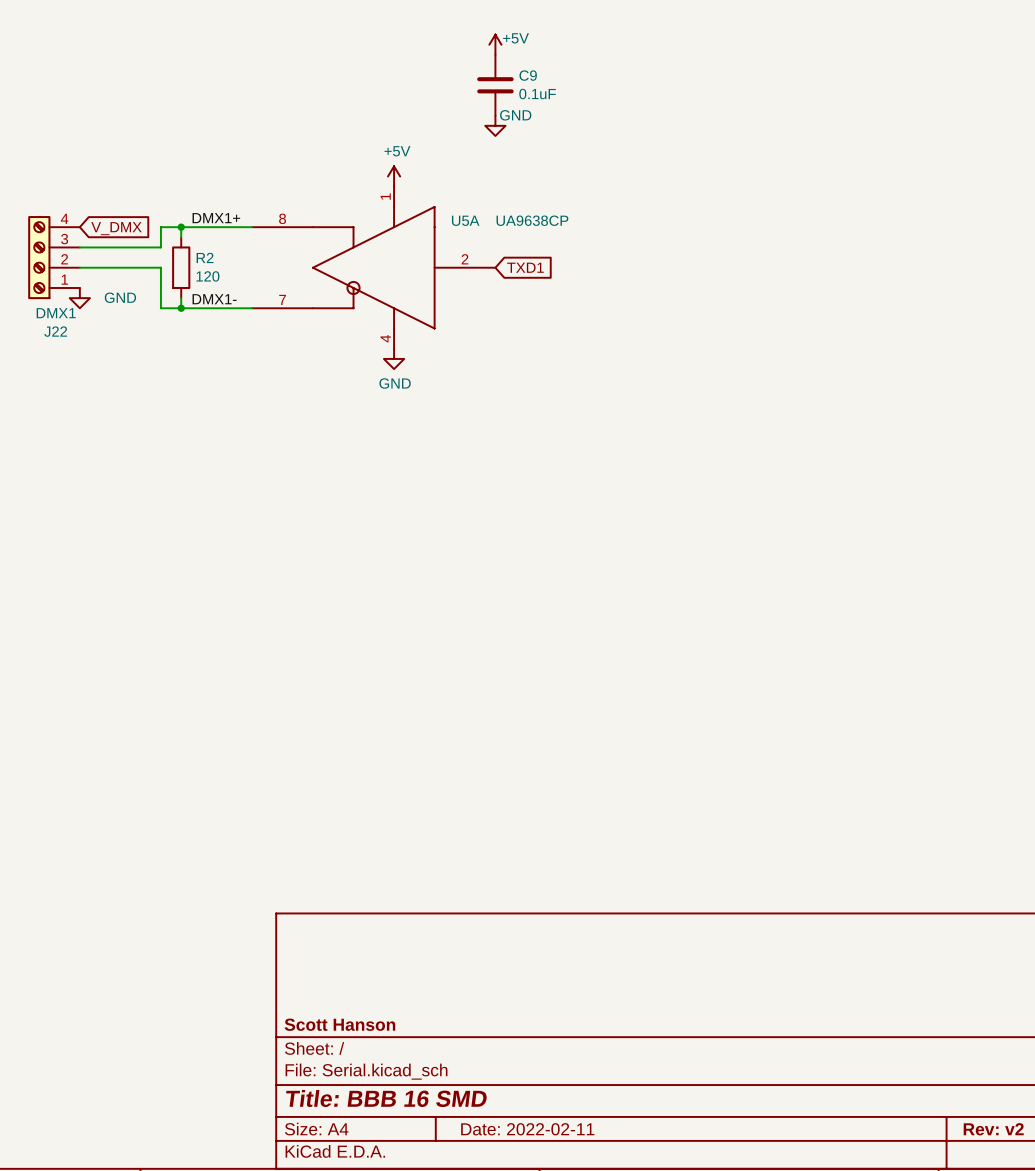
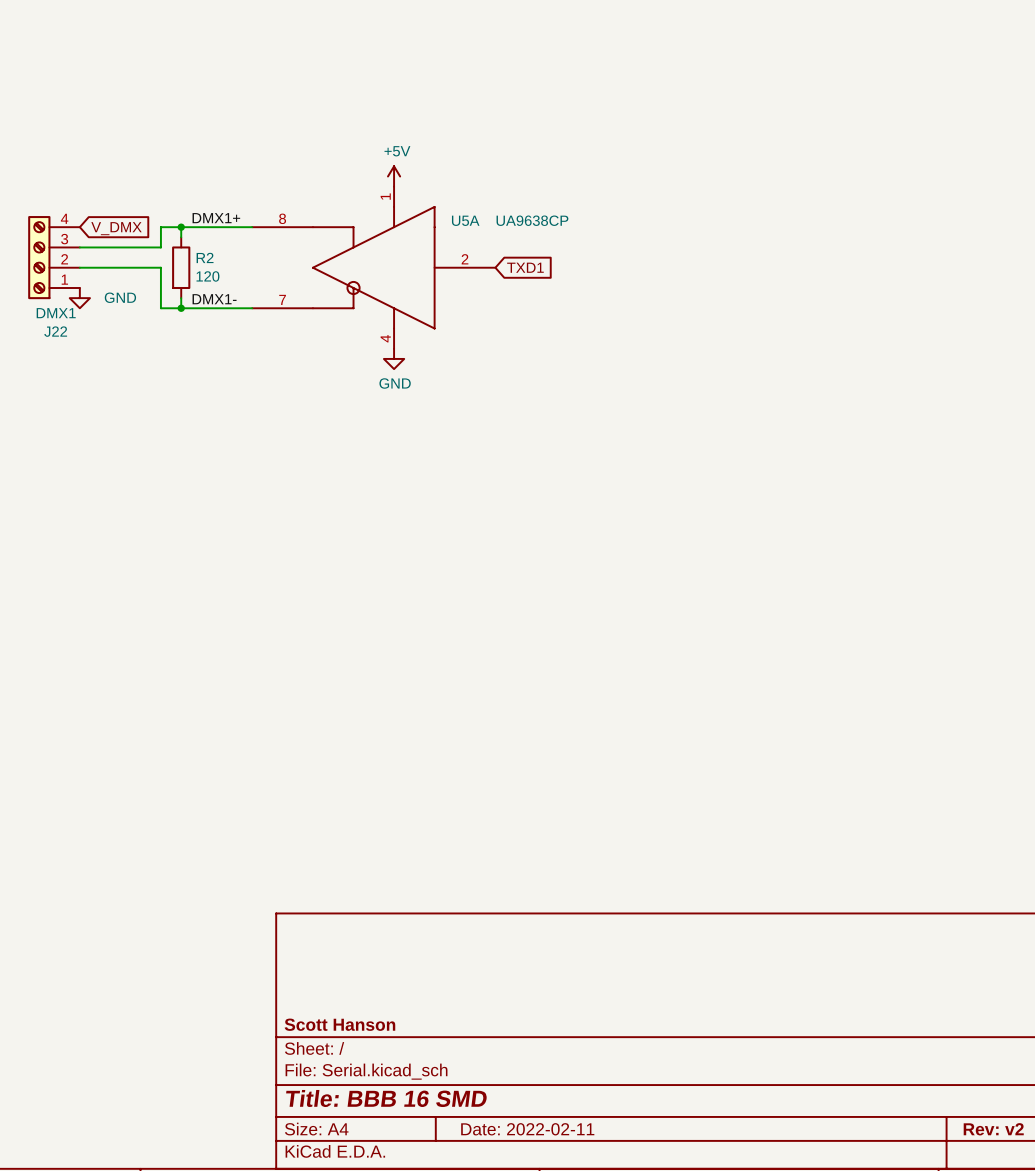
power symbol: +5V (495, 44) -> none
C9: 0.1uF (495, 85) -> none
power symbol: GND (495, 125) -> none

